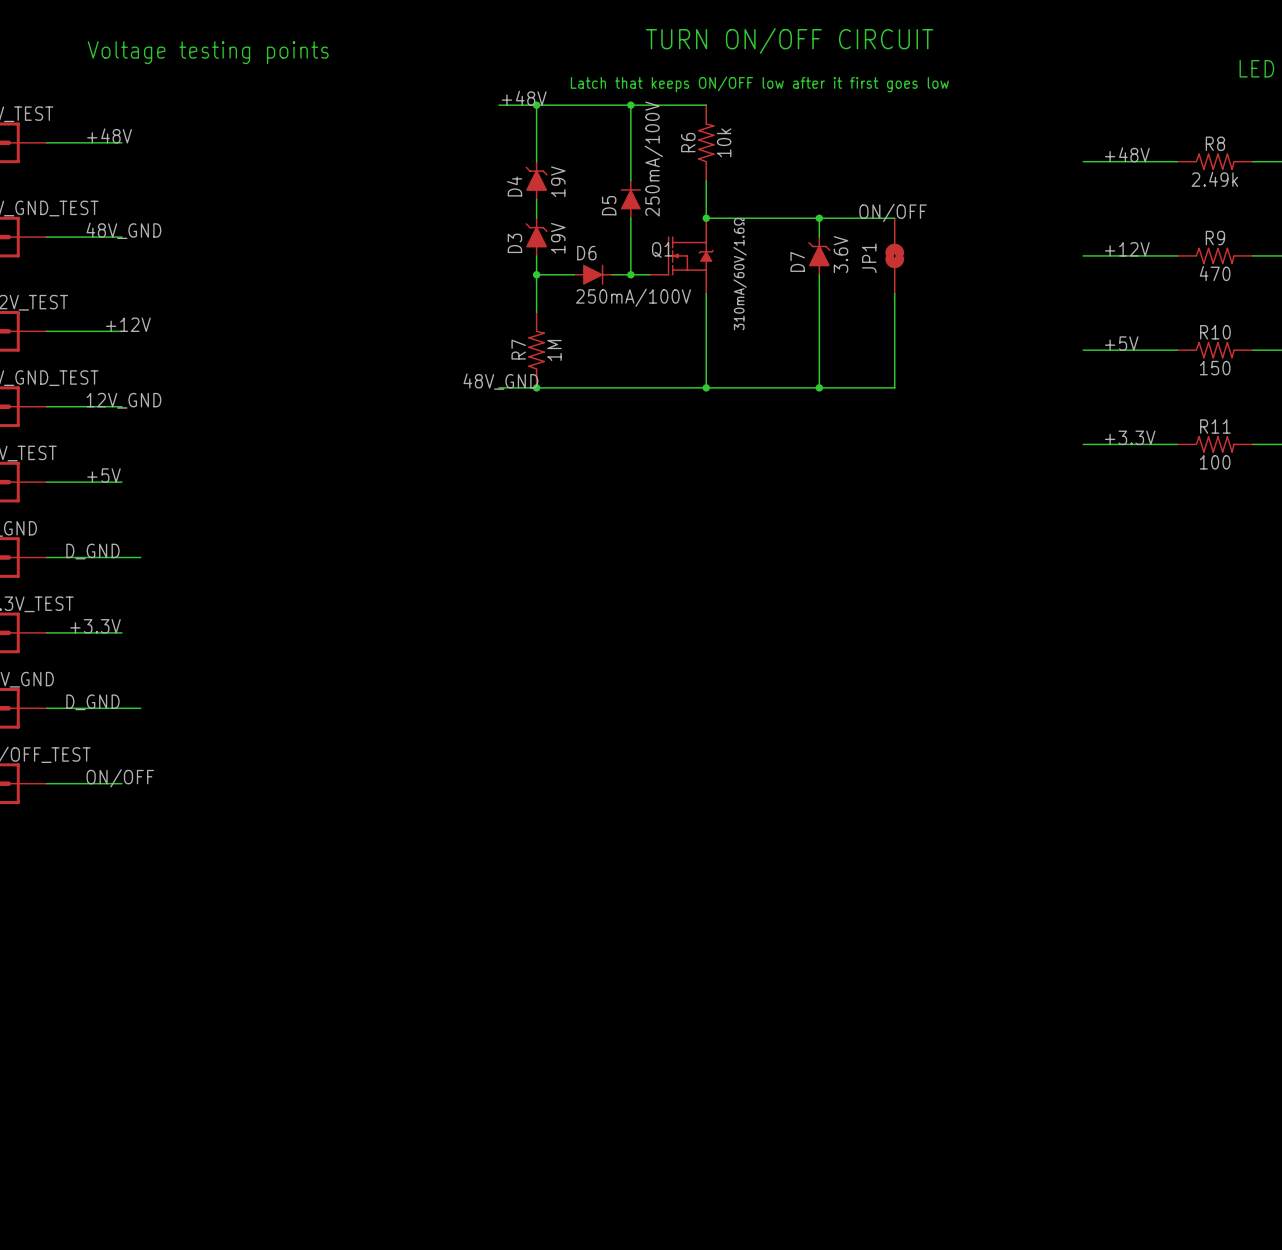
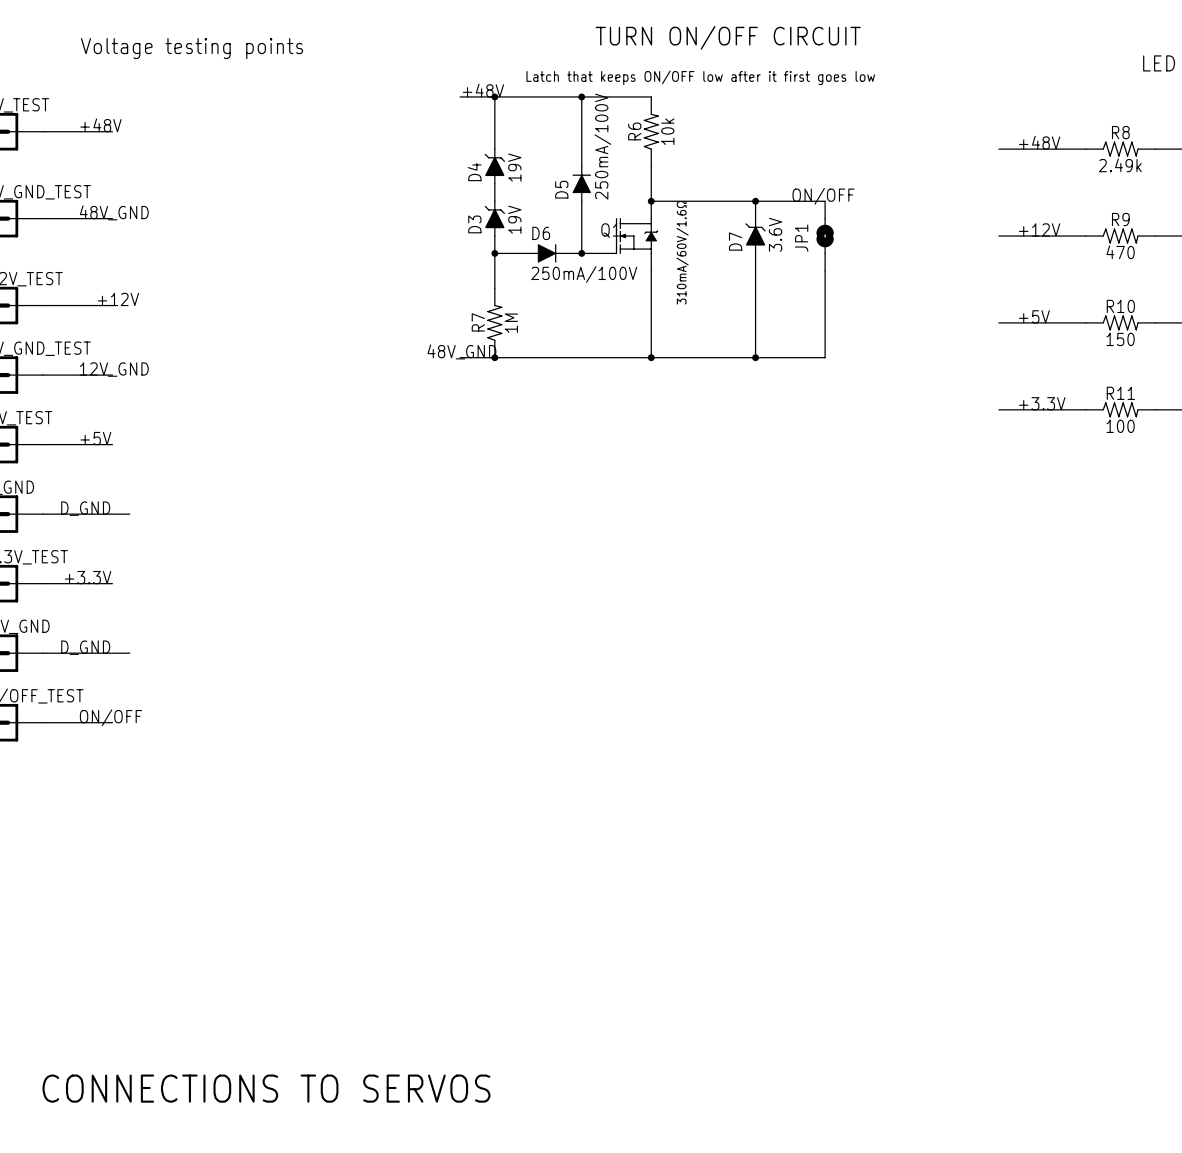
text: none -> CONNECTIONS TO SERVOS (266, 1088)

